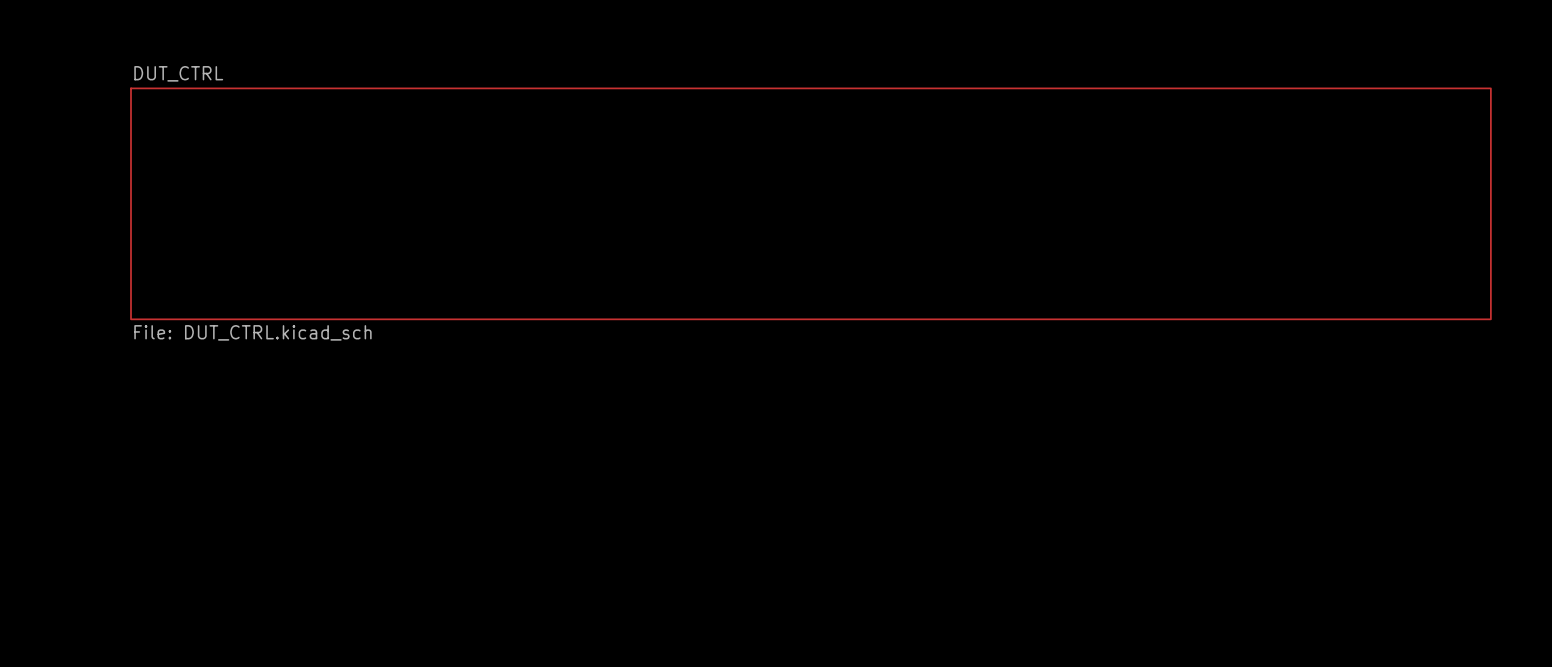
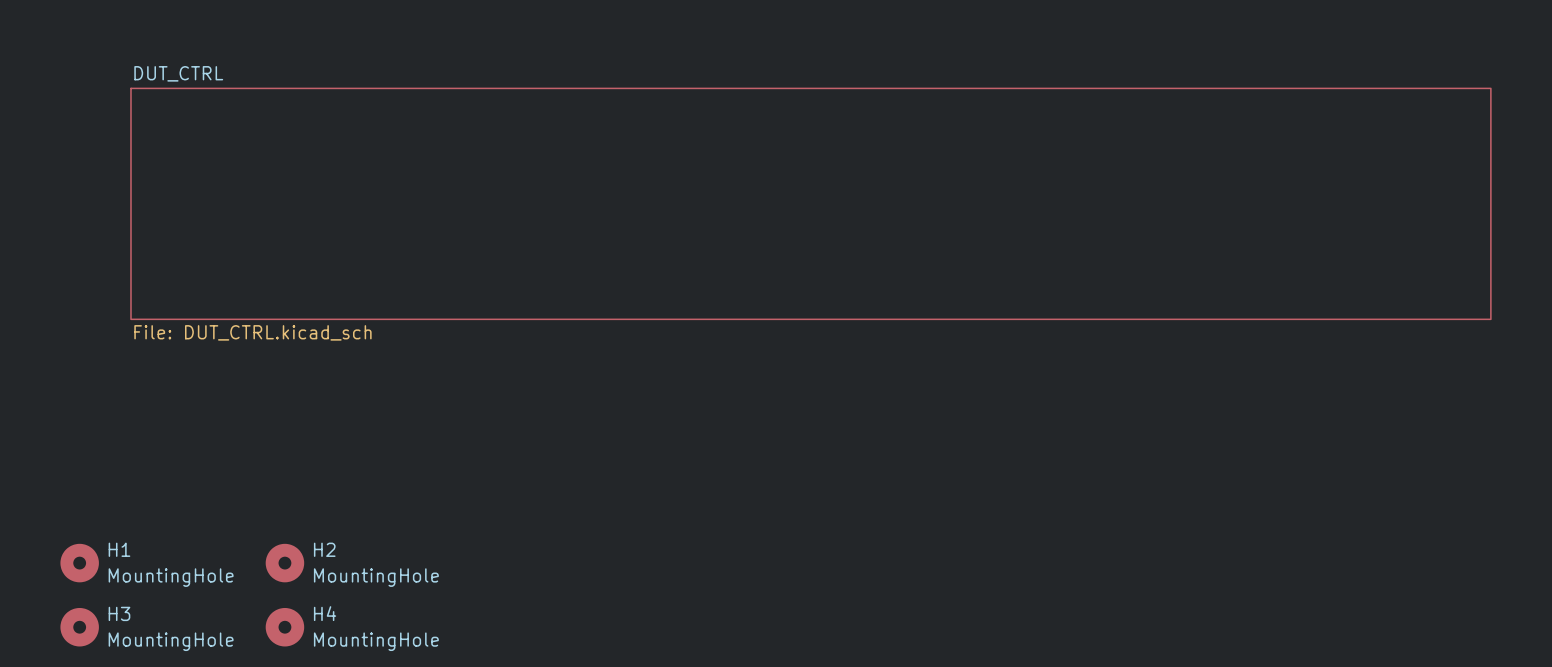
H1: none -> MountingHole (79, 563)
H2: none -> MountingHole (284, 563)
H3: none -> MountingHole (79, 627)
H4: none -> MountingHole (284, 627)

